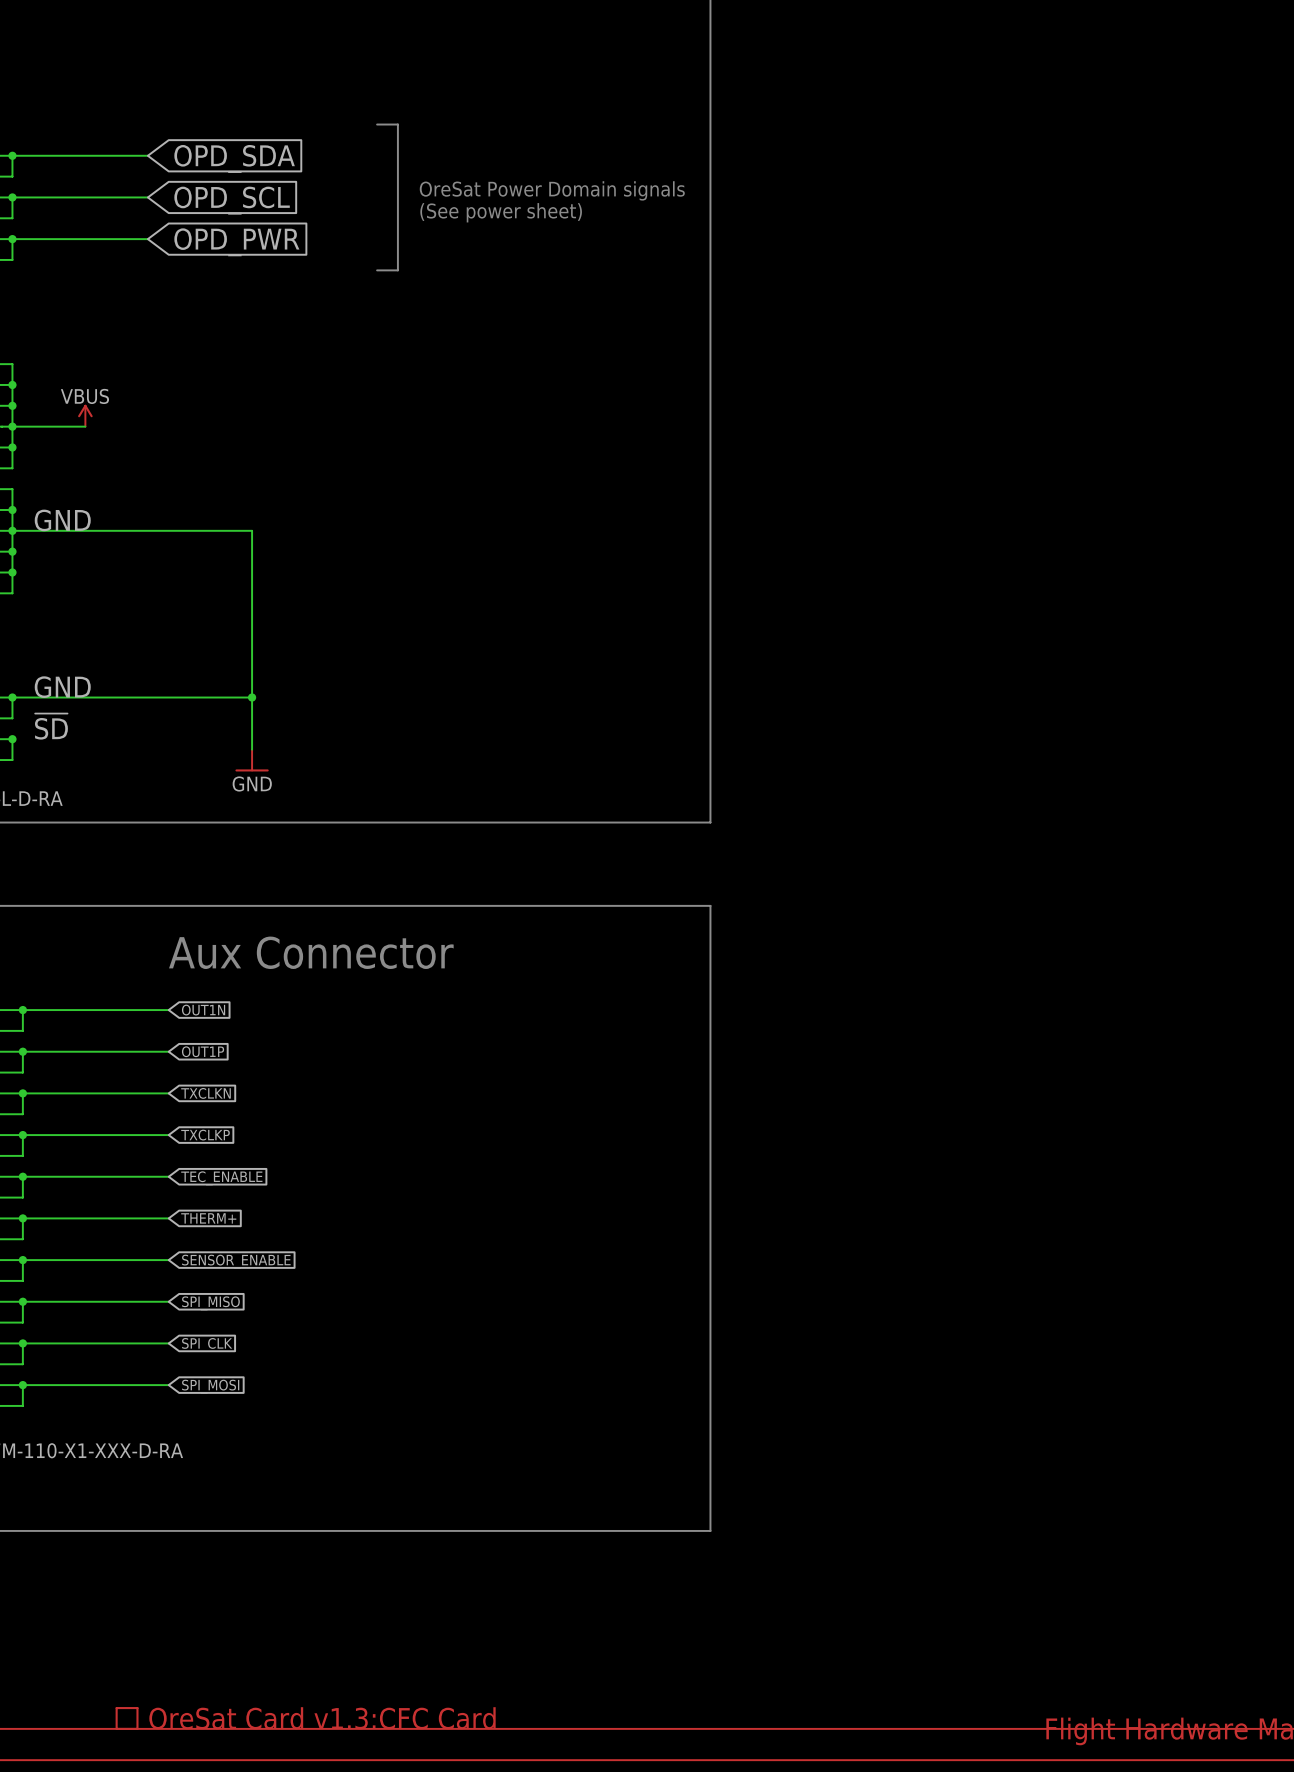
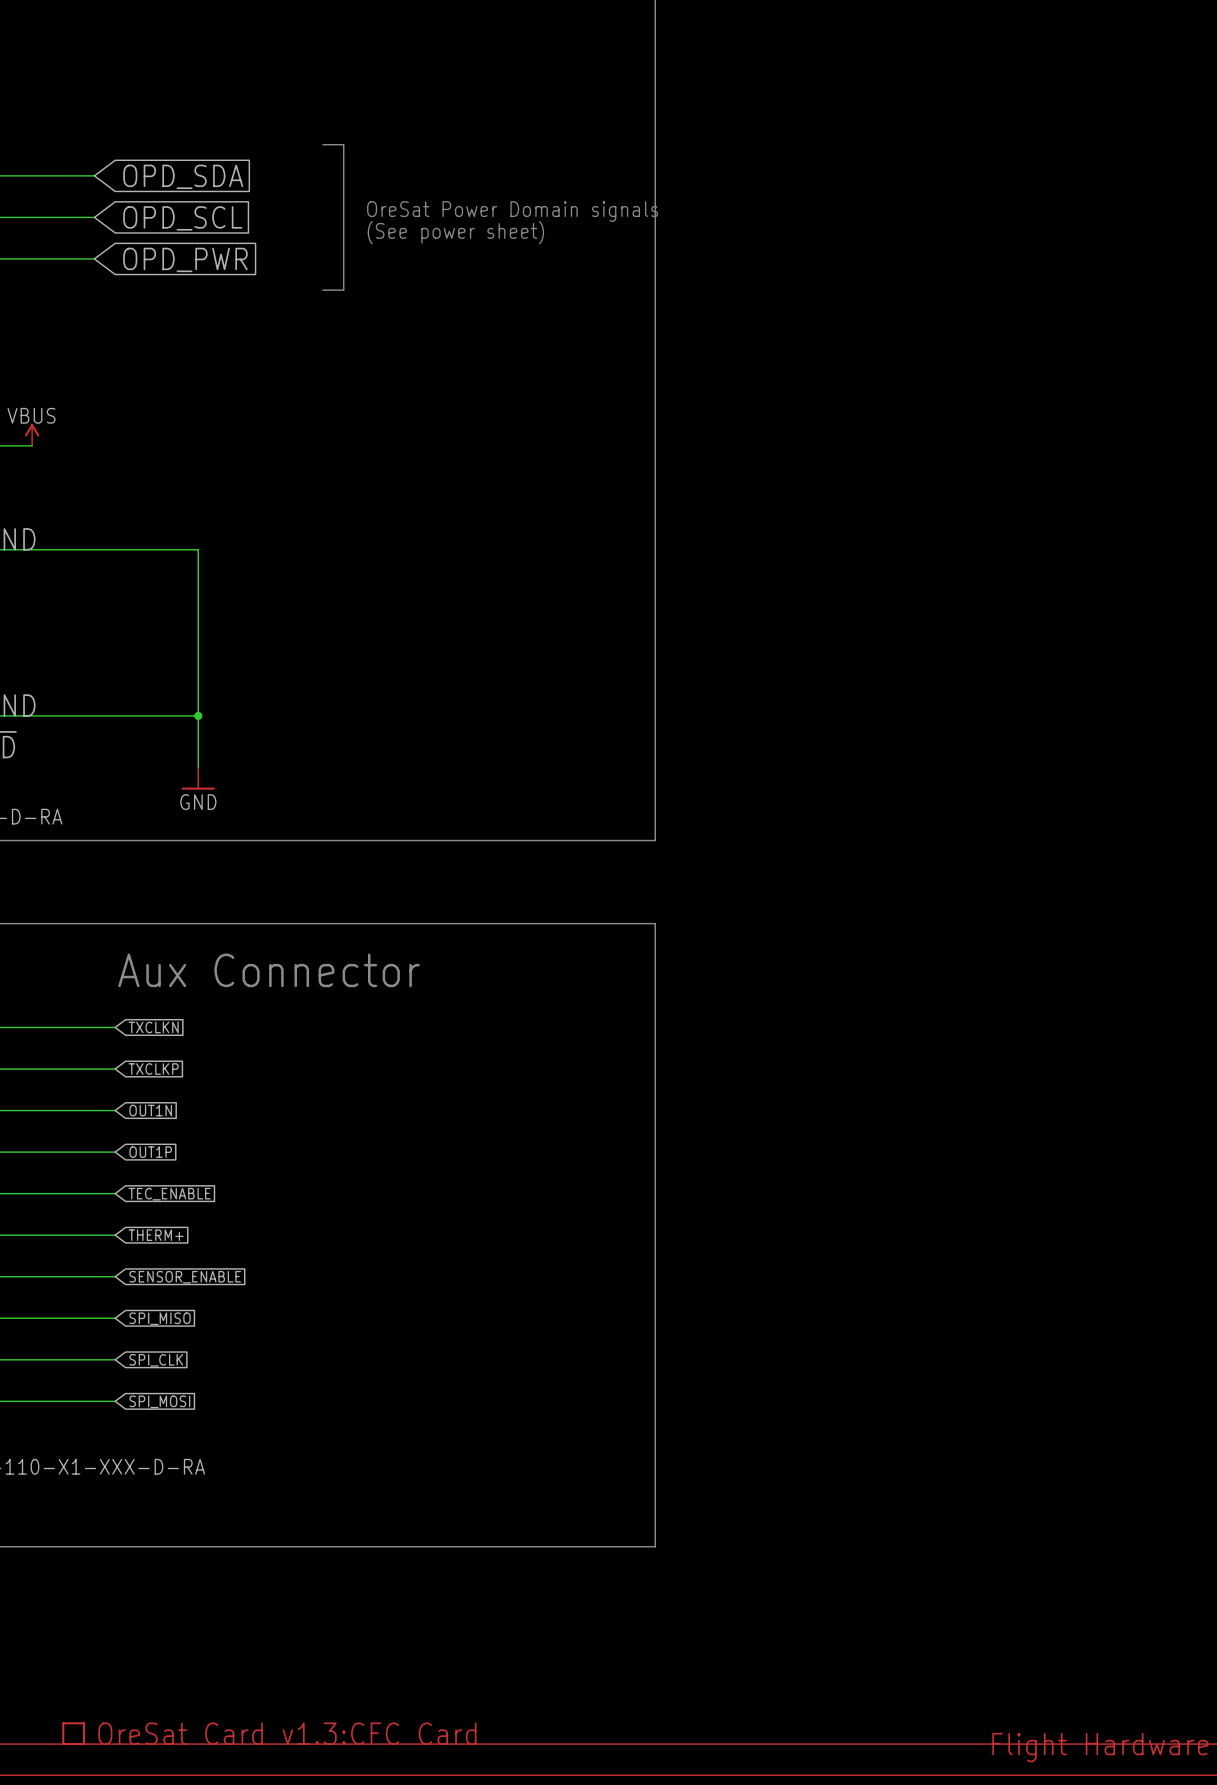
global label: OUT1N (203, 1010) -> TXCLKN (153, 1027)
global label: OUT1P (203, 1051) -> TXCLKP (153, 1069)
global label: TXCLKN (206, 1093) -> OUT1N (150, 1110)
global label: TXCLKP (205, 1135) -> OUT1P (150, 1152)

